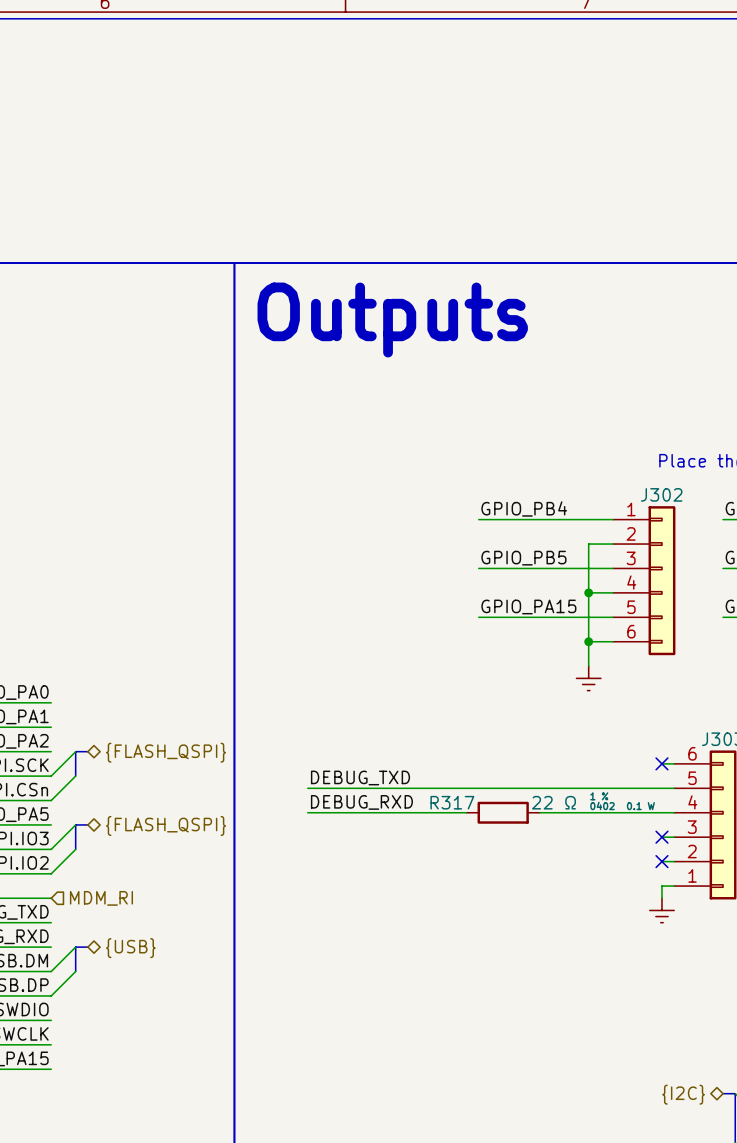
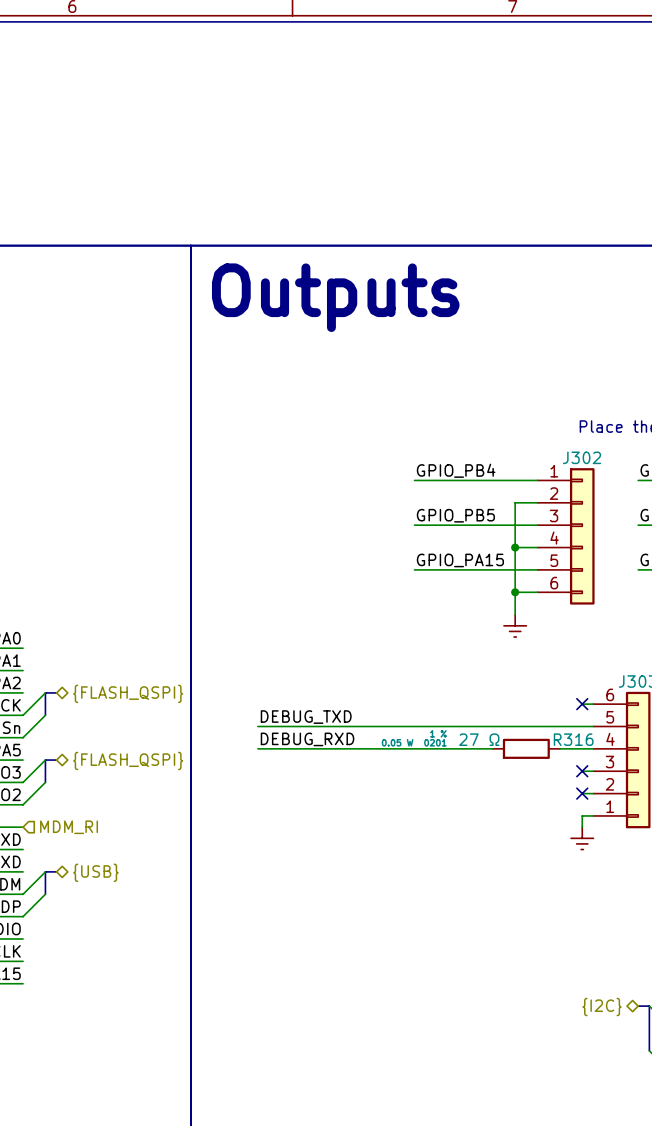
R317: 22 Ω (503, 812) -> none
wire: (564, 812) (637, 812) -> (403, 748) (470, 748)
R316: none -> 27 Ω (526, 748)

